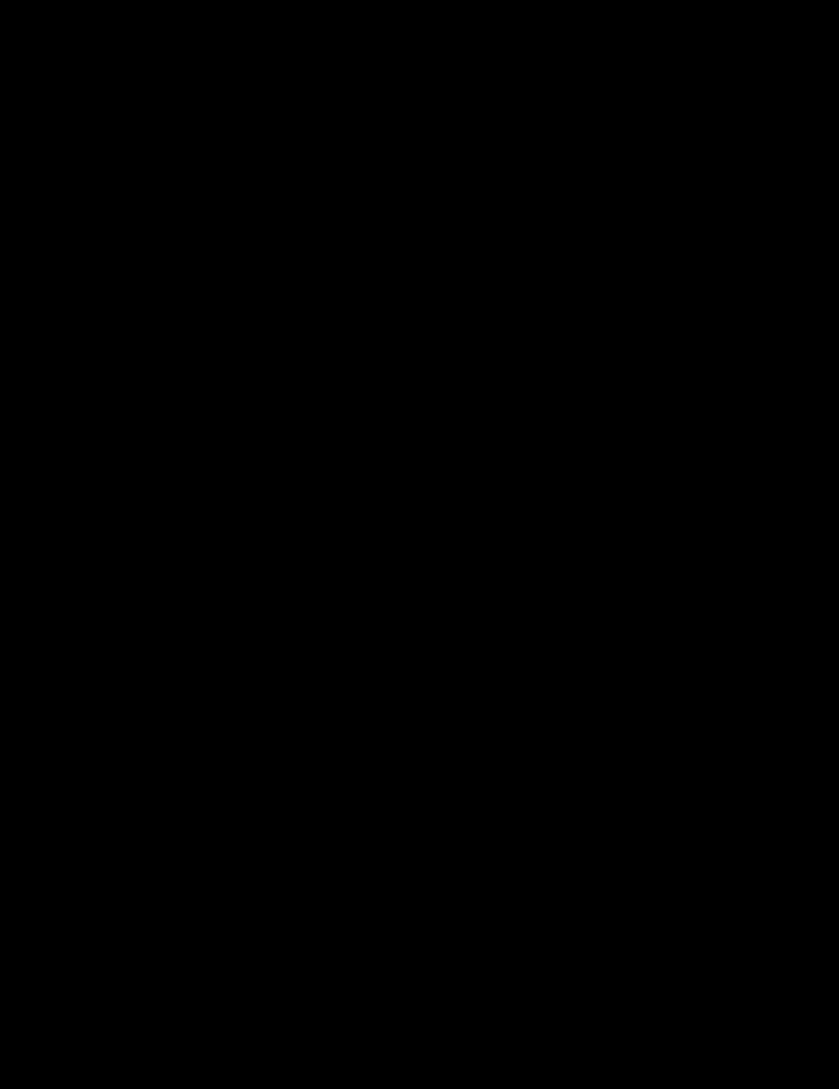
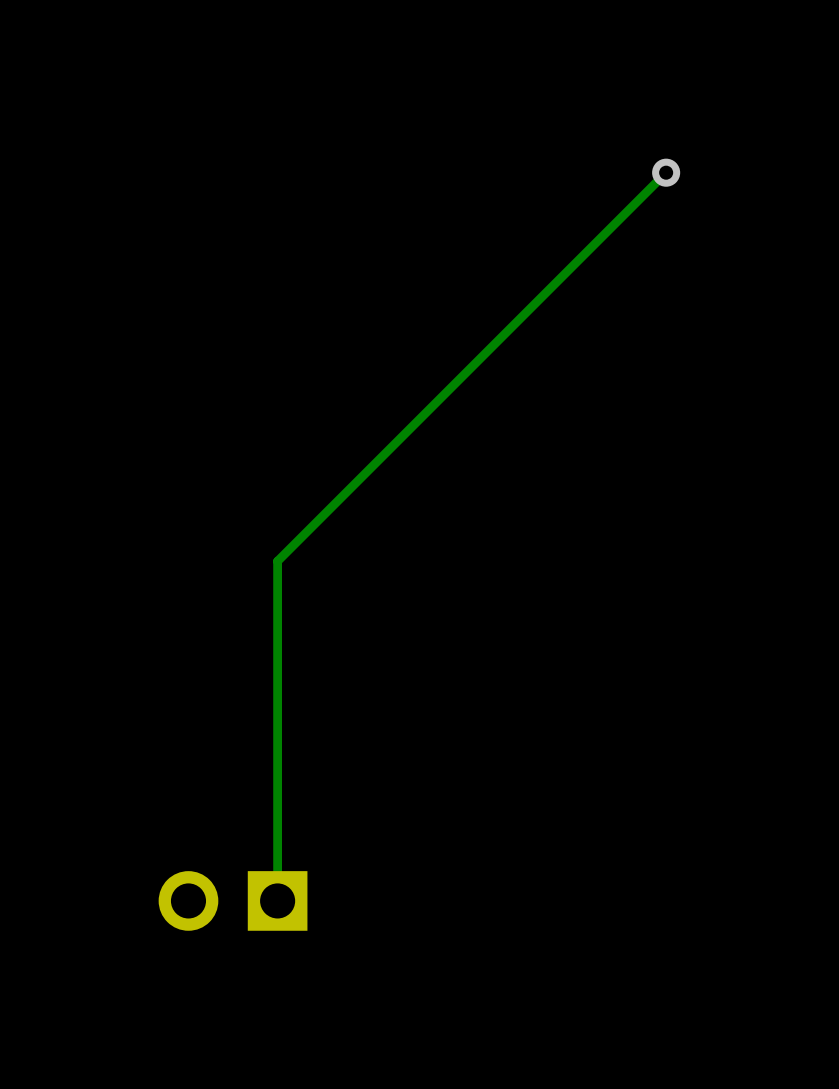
track: none -> (666, 172) (277, 561) (277, 900)
via: none -> (666, 172)
part: none -> (233, 900)

